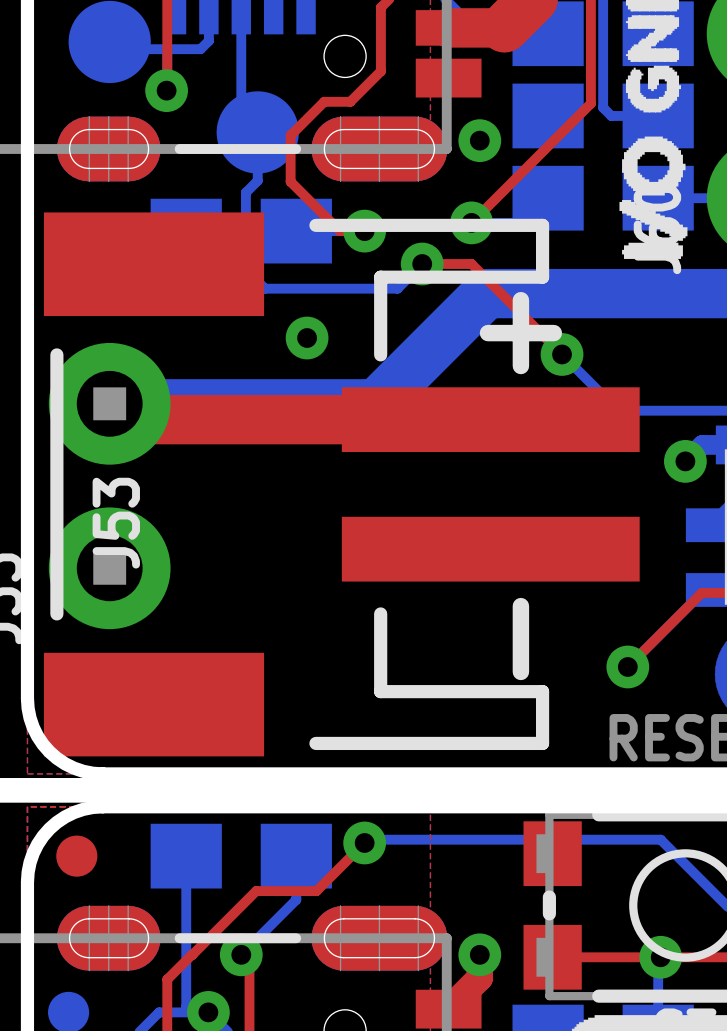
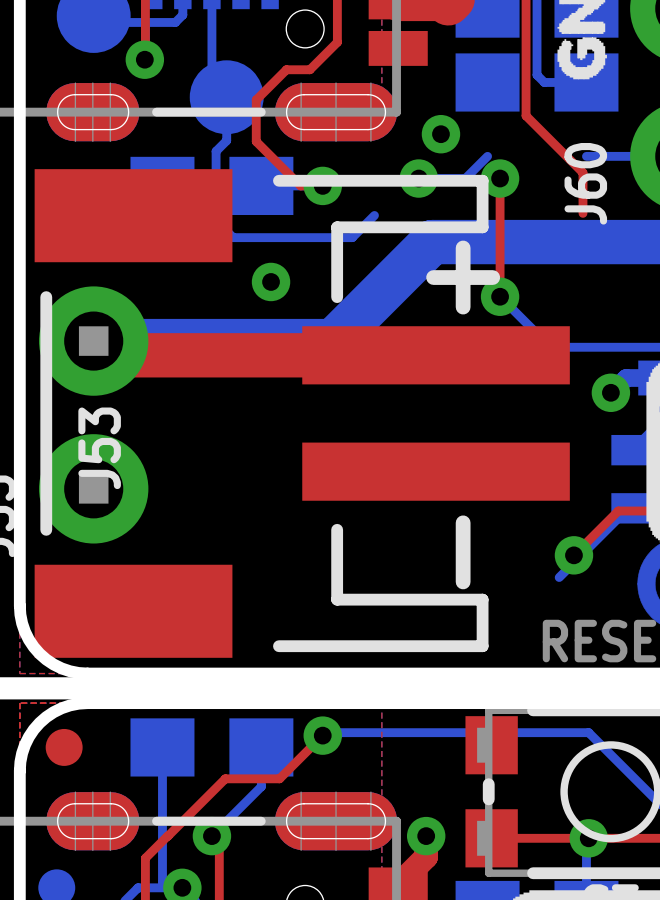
top track: (590, 103) (471, 222) -> (526, 71) (526, 115) (582, 172) (582, 213)
drawing: [619, 136, 688, 259] -> none
via position: (479, 140) -> (440, 134)
part: (603, 198) -> none
via: none -> (500, 178)
top track: (422, 264) (471, 264) (562, 354) -> (500, 178) (500, 296)
via: (422, 264) -> none
top track: (701, 592) (627, 666) -> (625, 511) (618, 511) (573, 555)
via position: (627, 666) -> (573, 555)

